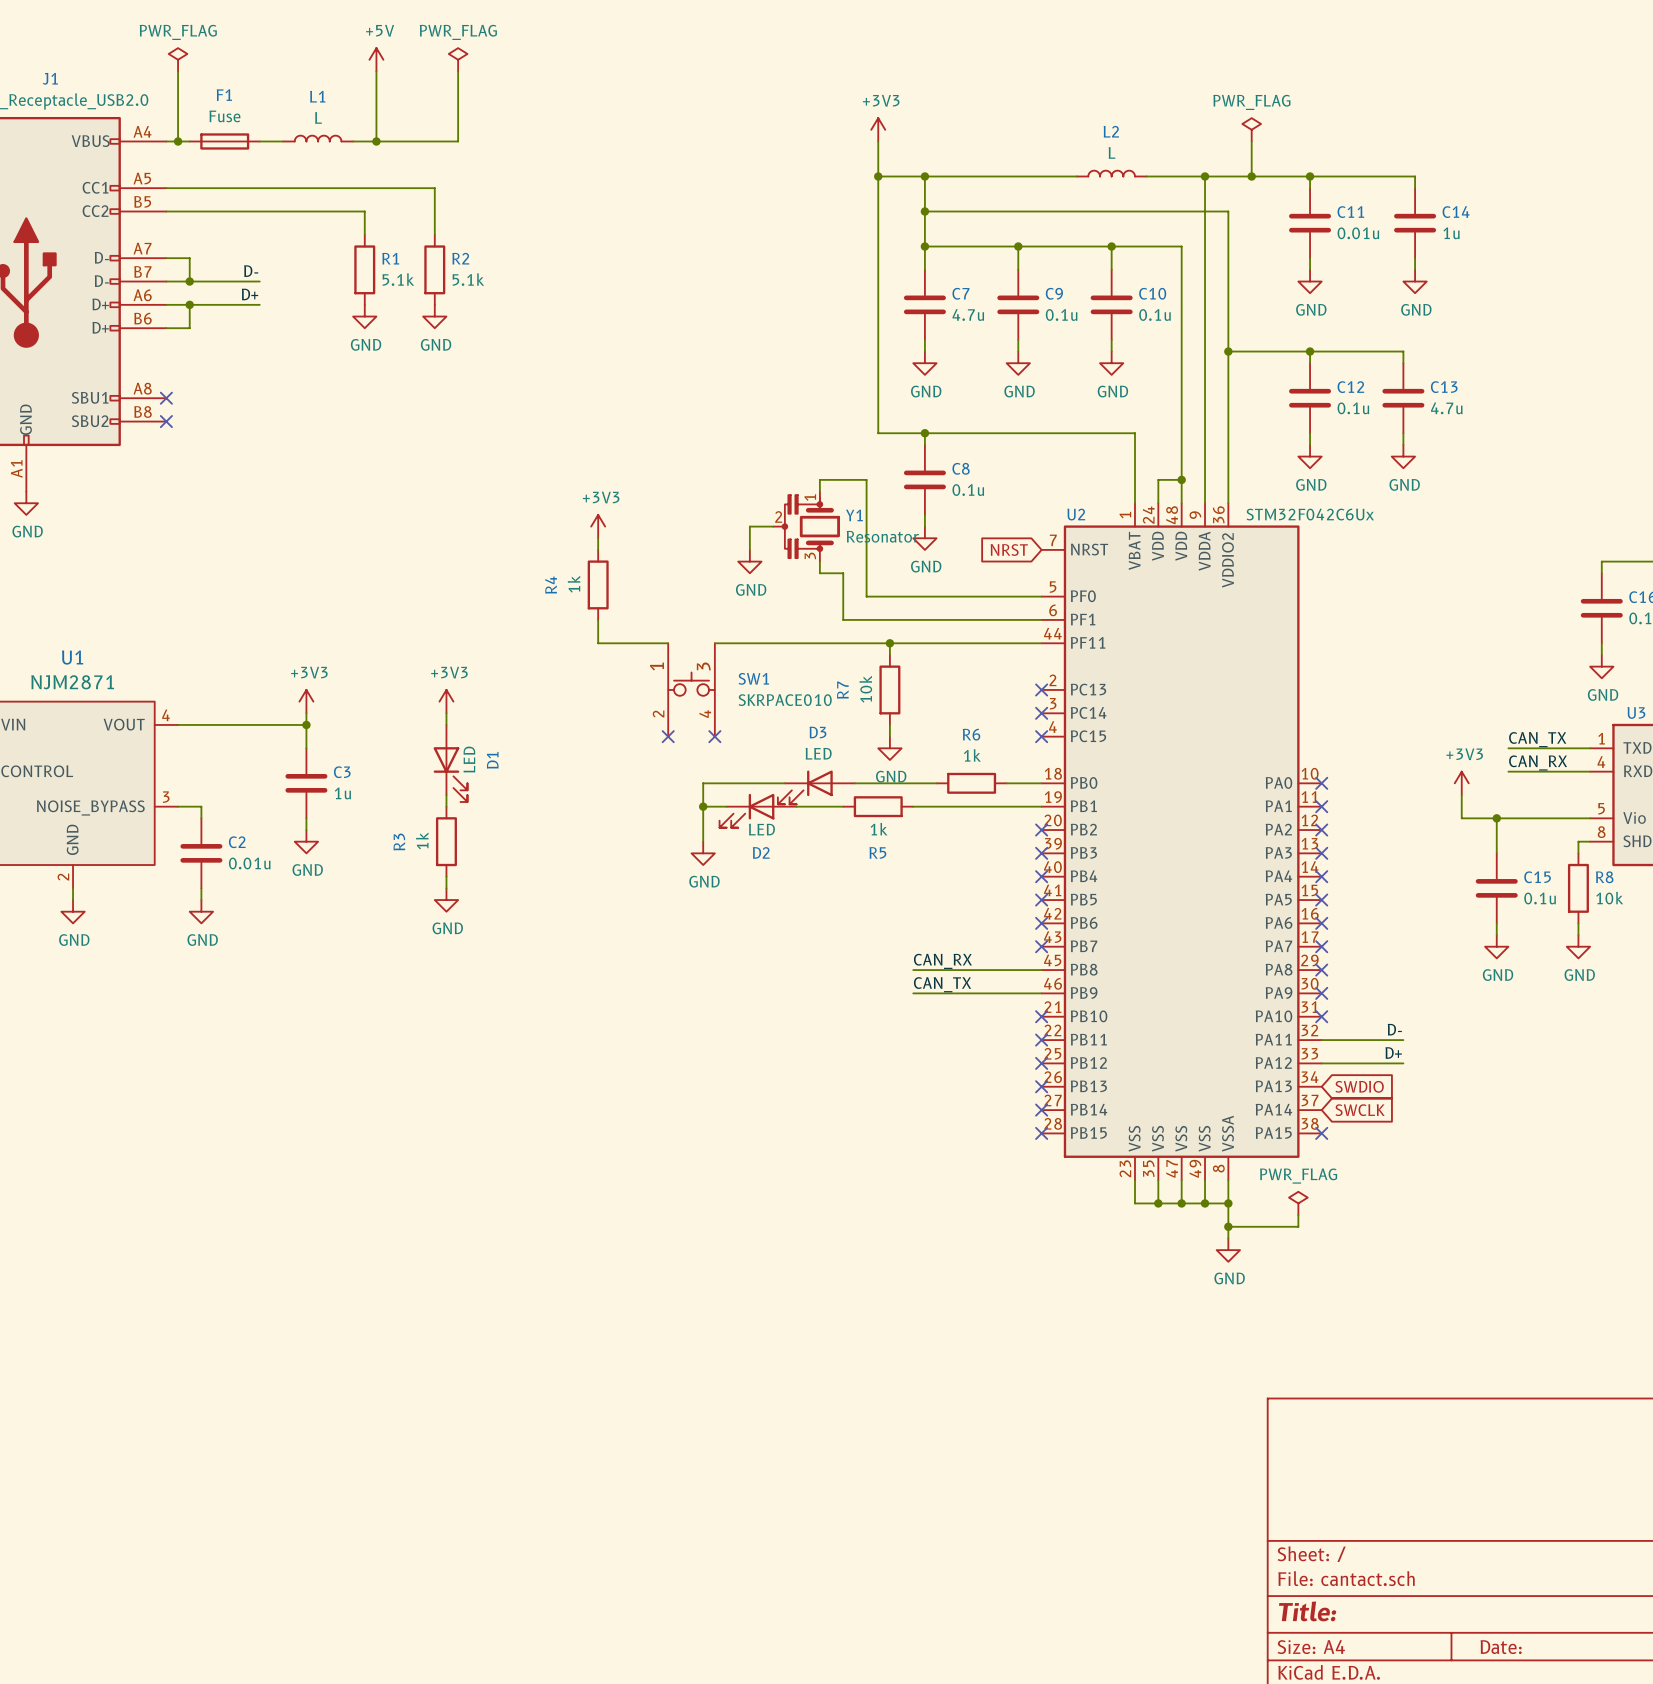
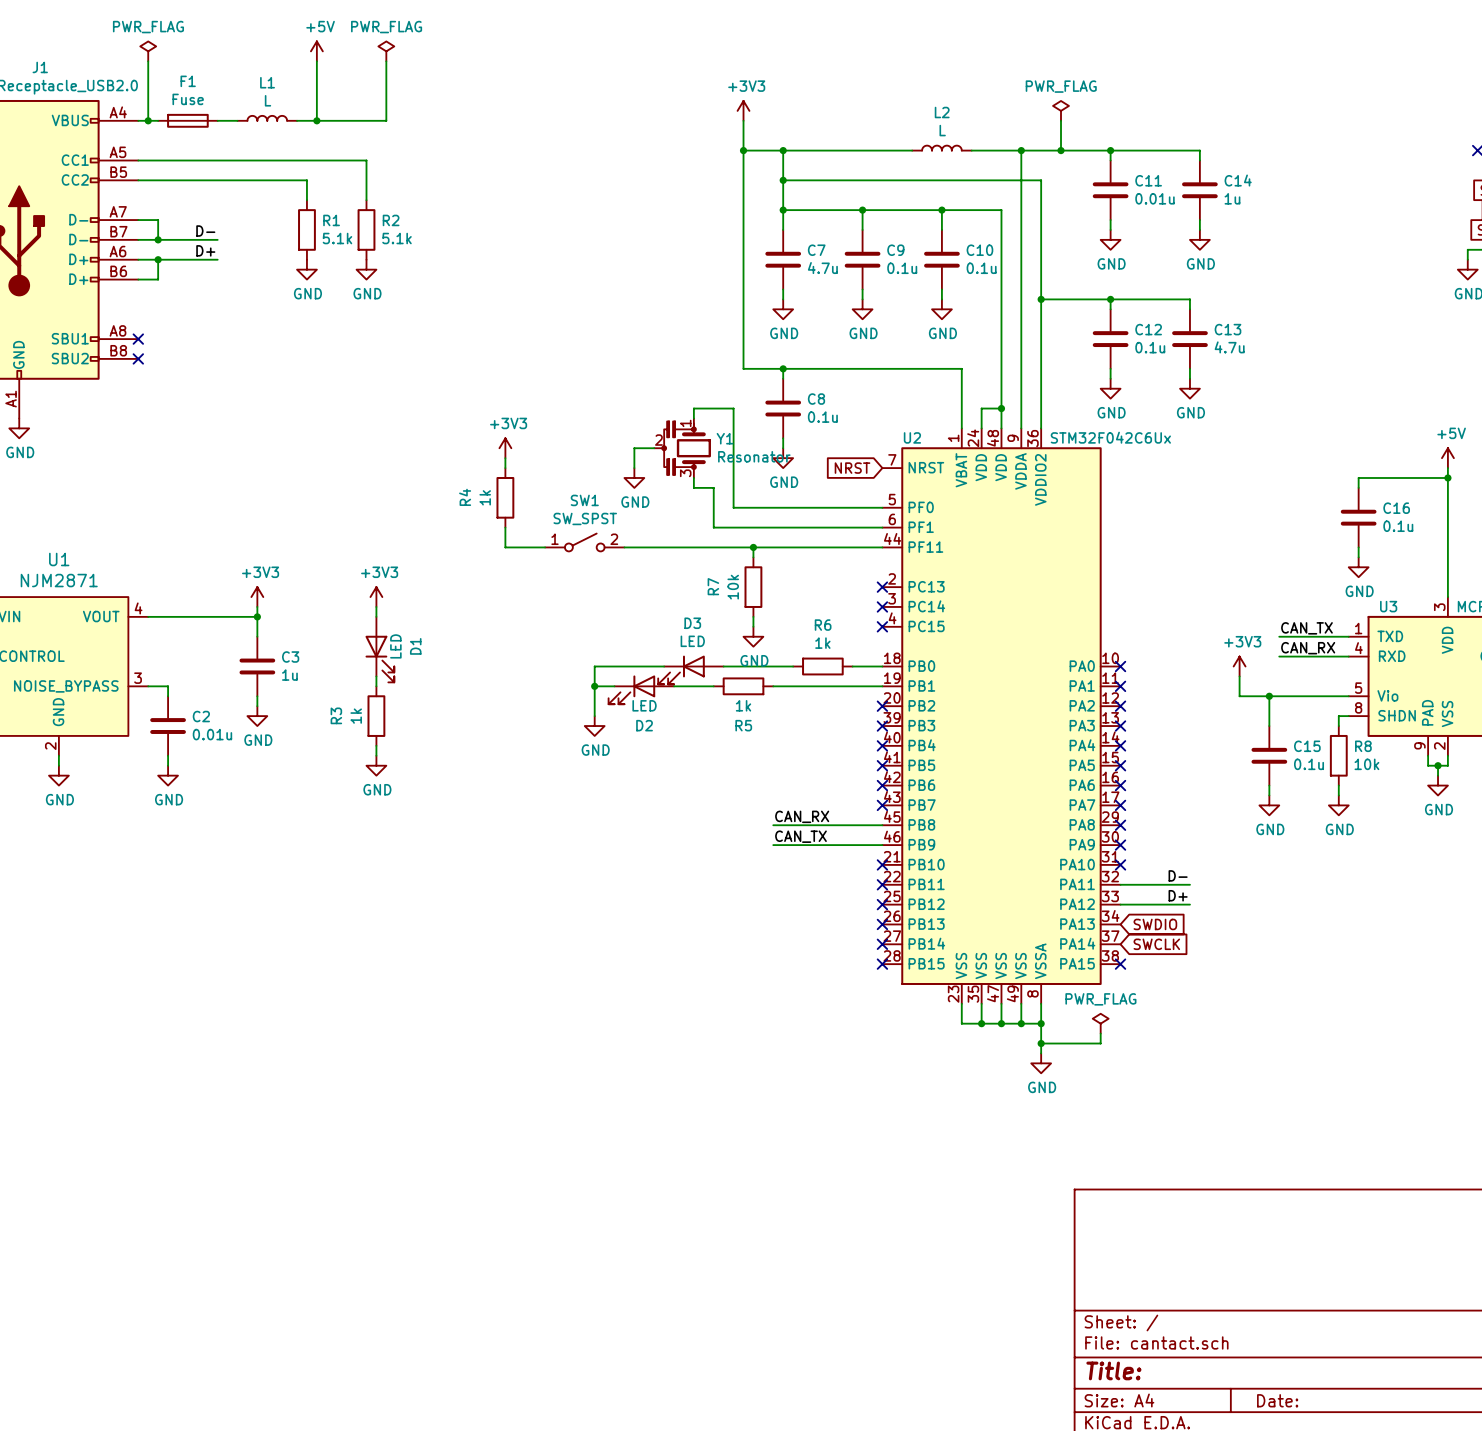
SW1 symbol: [668, 643, 715, 737] -> [545, 533, 625, 552]
SW1 name position: SW1 (753, 678) -> SW1 (584, 500)
SW1 value: SKRPACE010 (785, 700) -> SW_SPST (585, 518)
no-connect mark: (668, 736) -> none
no-connect mark: (714, 736) -> none

